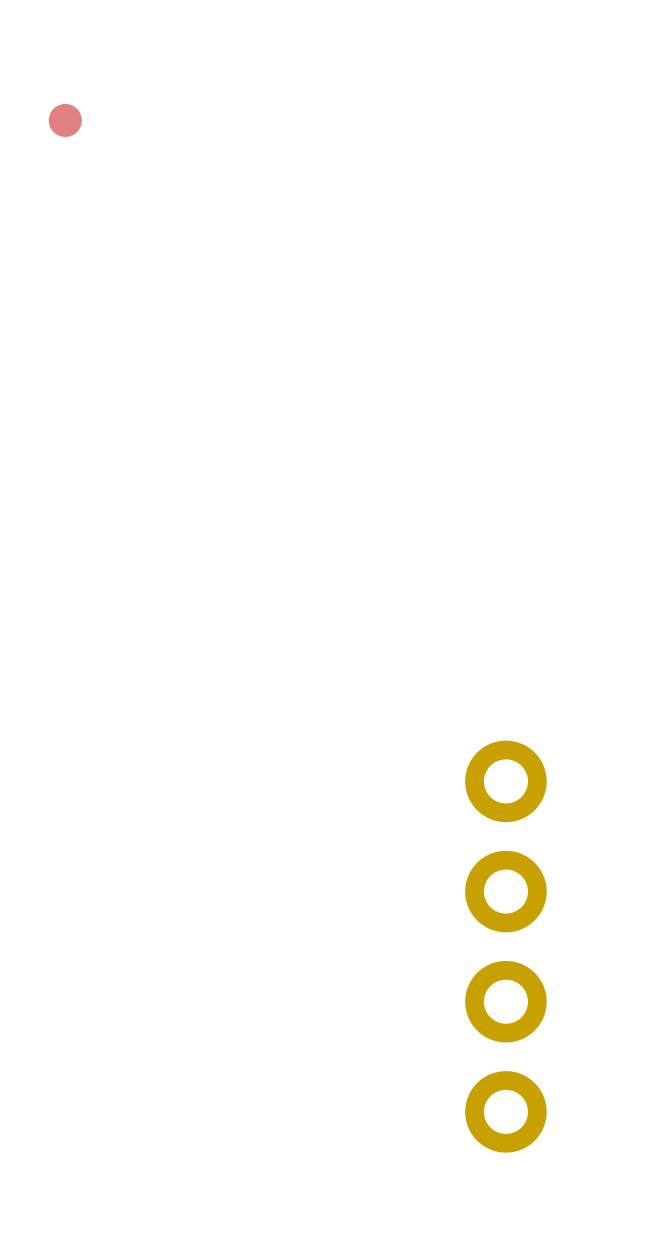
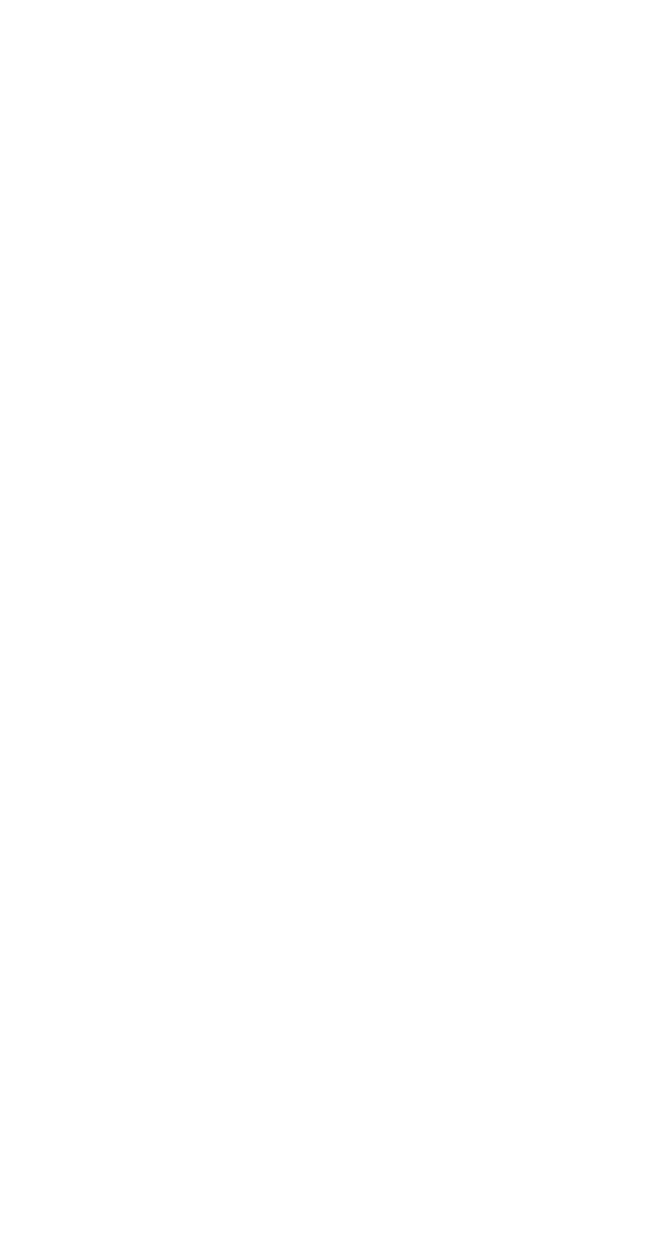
part: (65, 120) -> none
part: (505, 946) -> none

